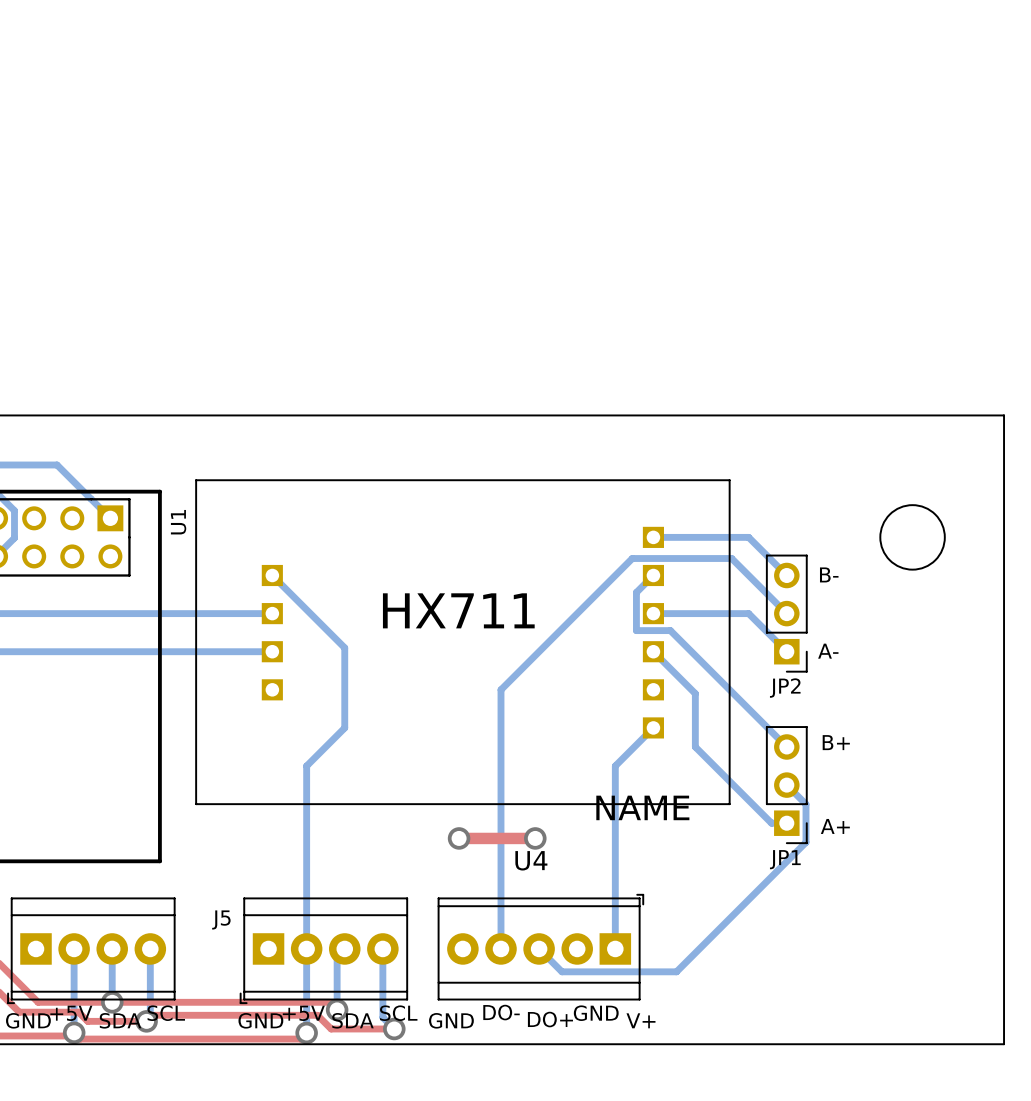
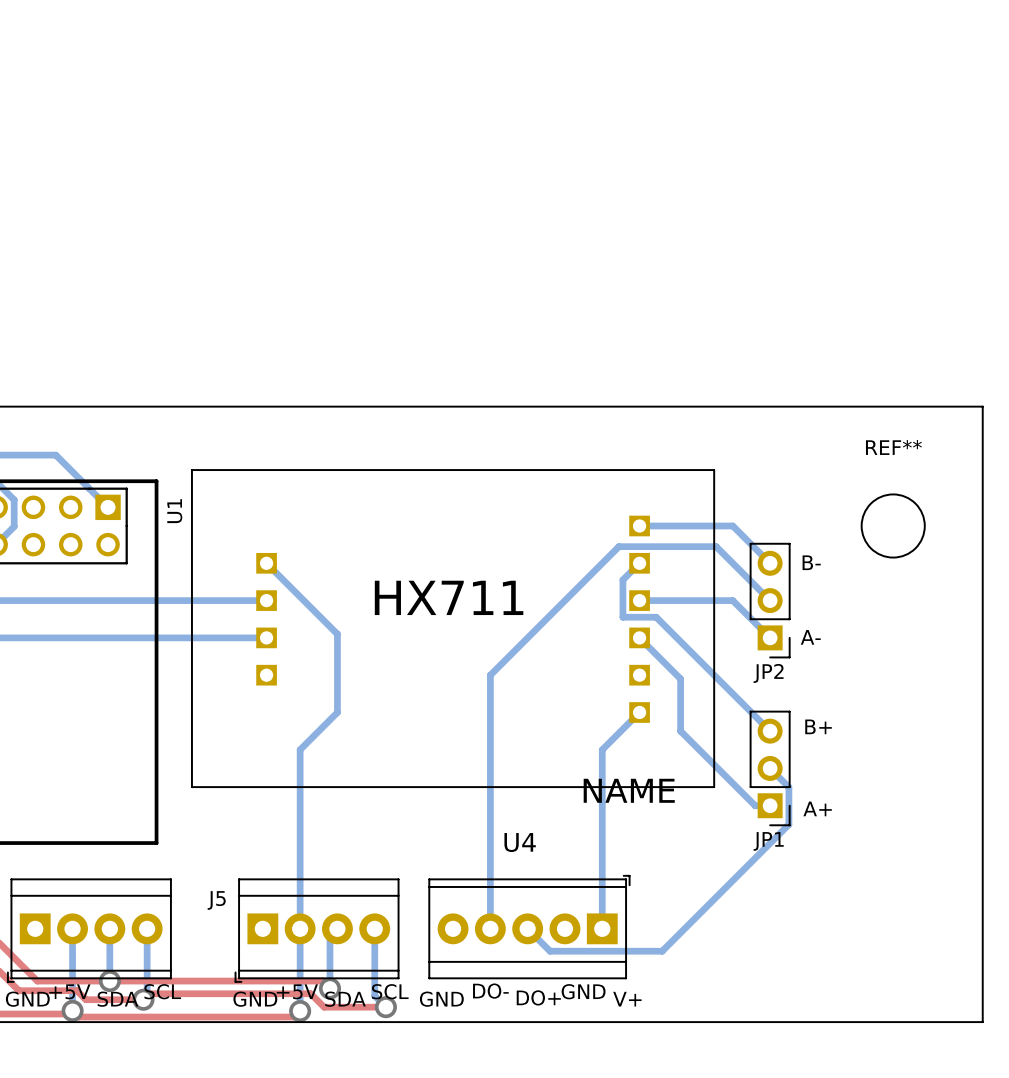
REF** name: none -> REF** (893, 447)
top track: (459, 838) (535, 838) -> none
via: (459, 838) -> none
via: (535, 838) -> none

